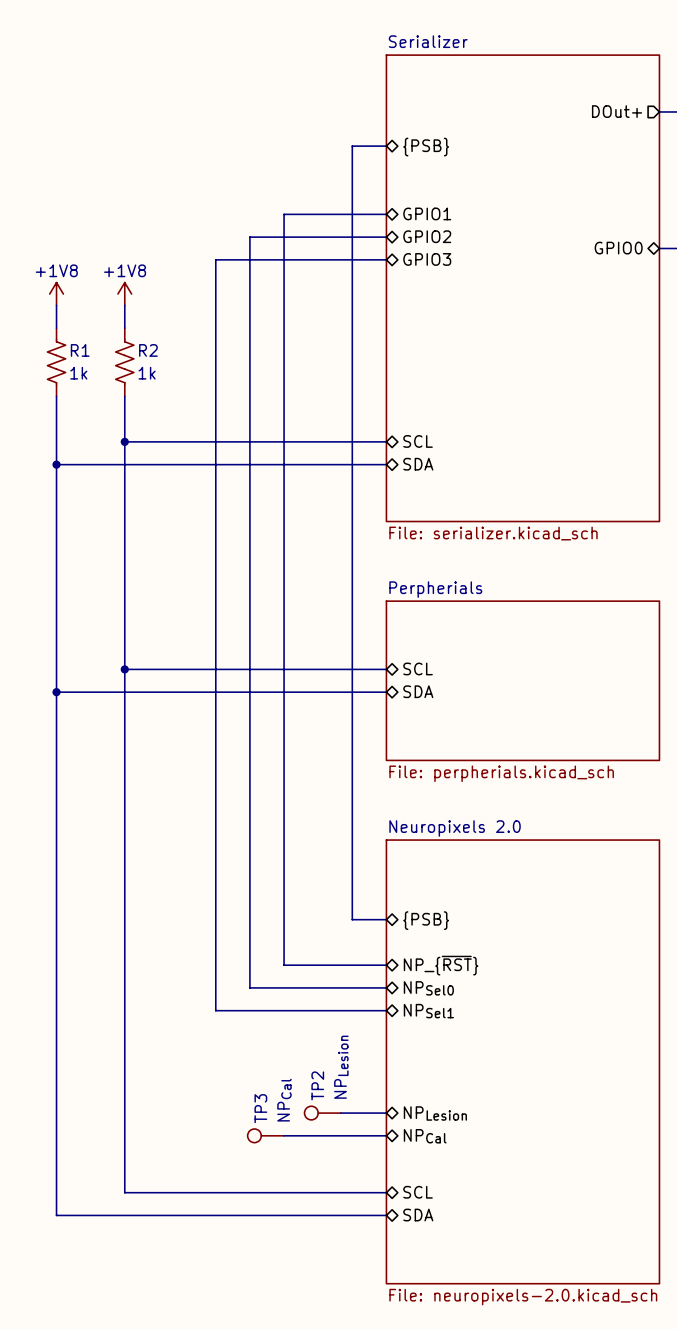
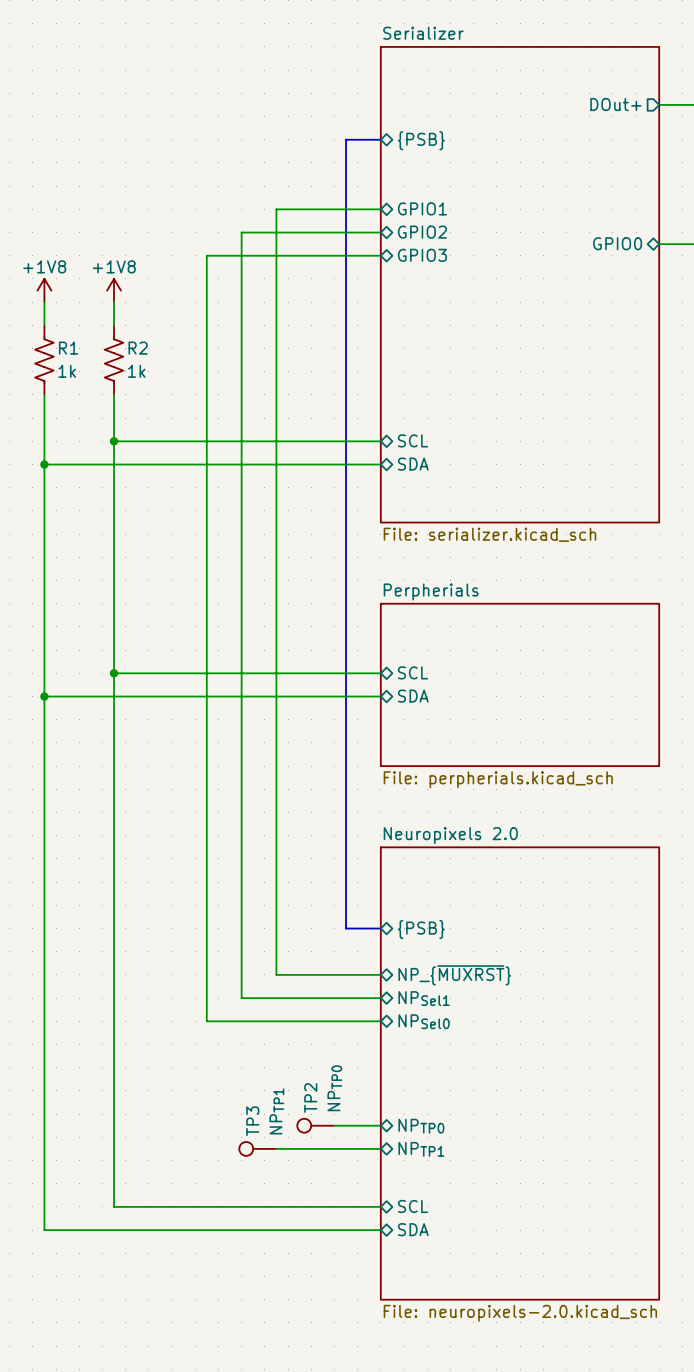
sheet pin: NP_{~{RST}} (441, 965) -> NP_{~{MUXRST}} (454, 975)
sheet pin: NPSel0 (428, 988) -> NPSel1 (424, 998)
sheet pin: NPSel1 (428, 1011) -> NPSel0 (424, 1021)
TP2 value: NPLesion (341, 1067) -> NPTP0 (334, 1088)
TP3 value: NPCal (284, 1100) -> NPTP1 (276, 1111)
sheet pin: NPLesion (435, 1113) -> NPTP0 (421, 1126)
sheet pin: NPCal (425, 1136) -> NPTP1 (421, 1149)

